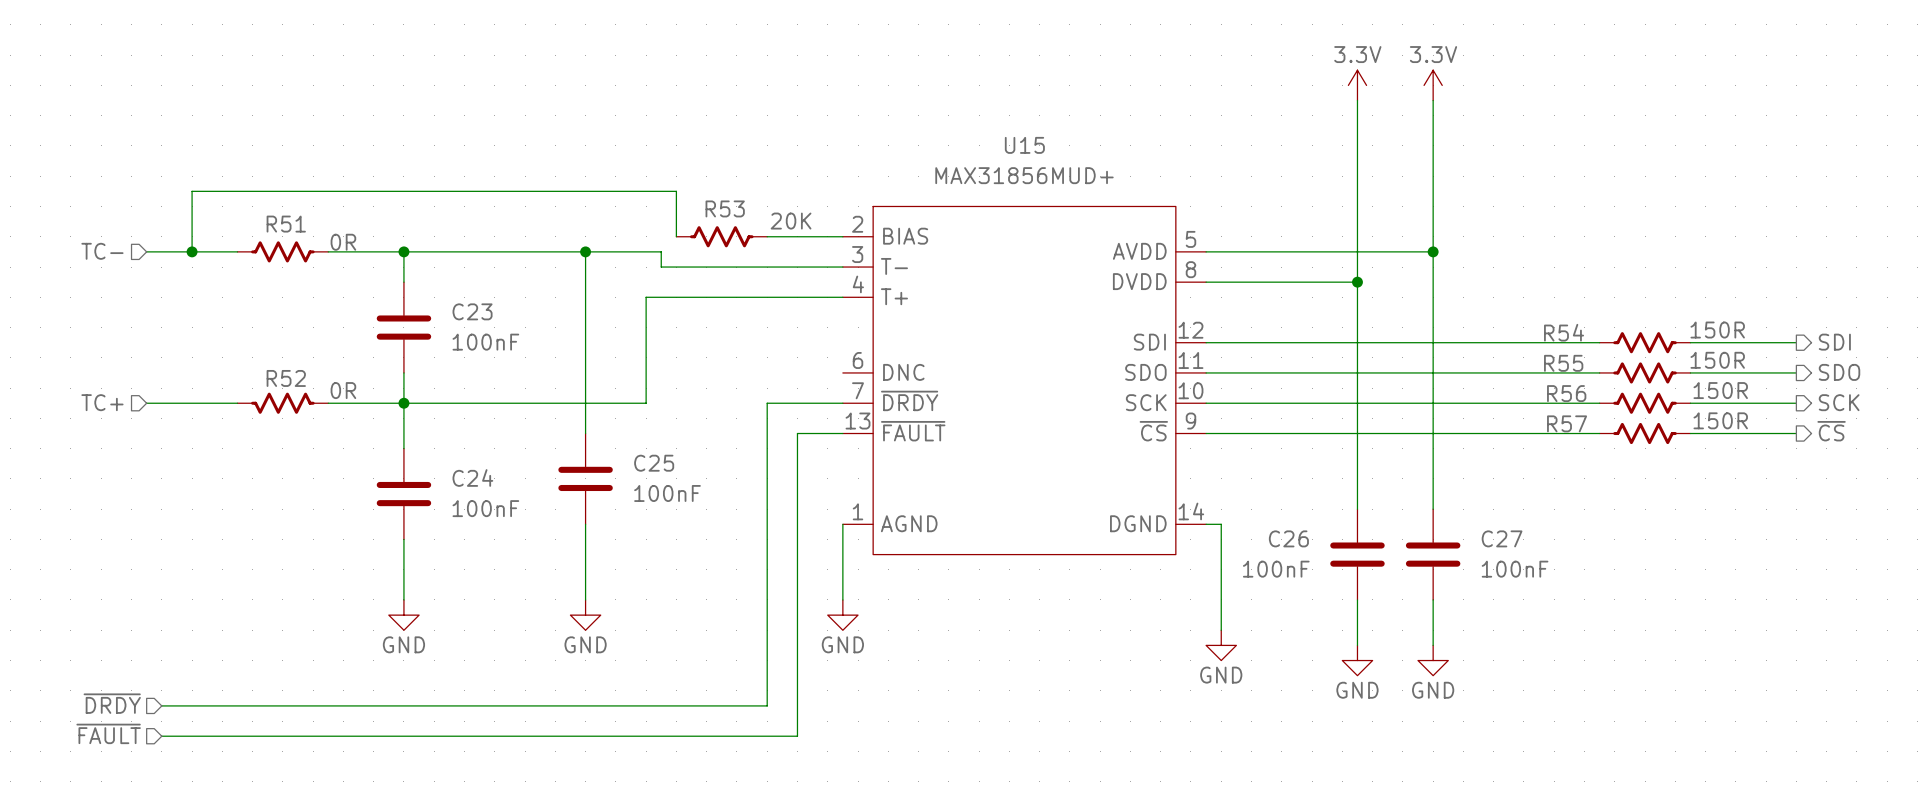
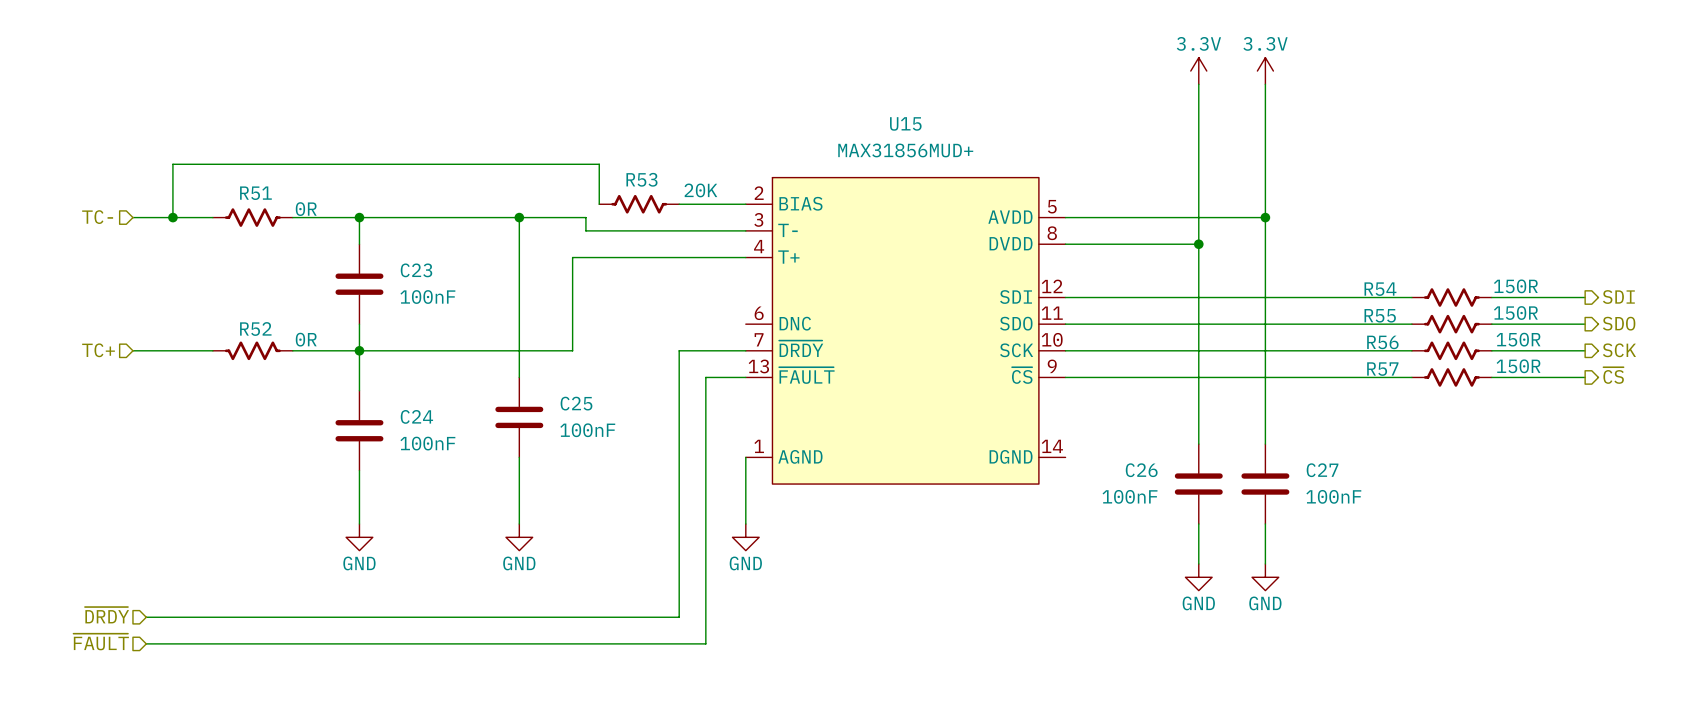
wire: (1206, 524) (1221, 524) (1221, 630) -> none
power symbol: GND (1221, 645) -> none

